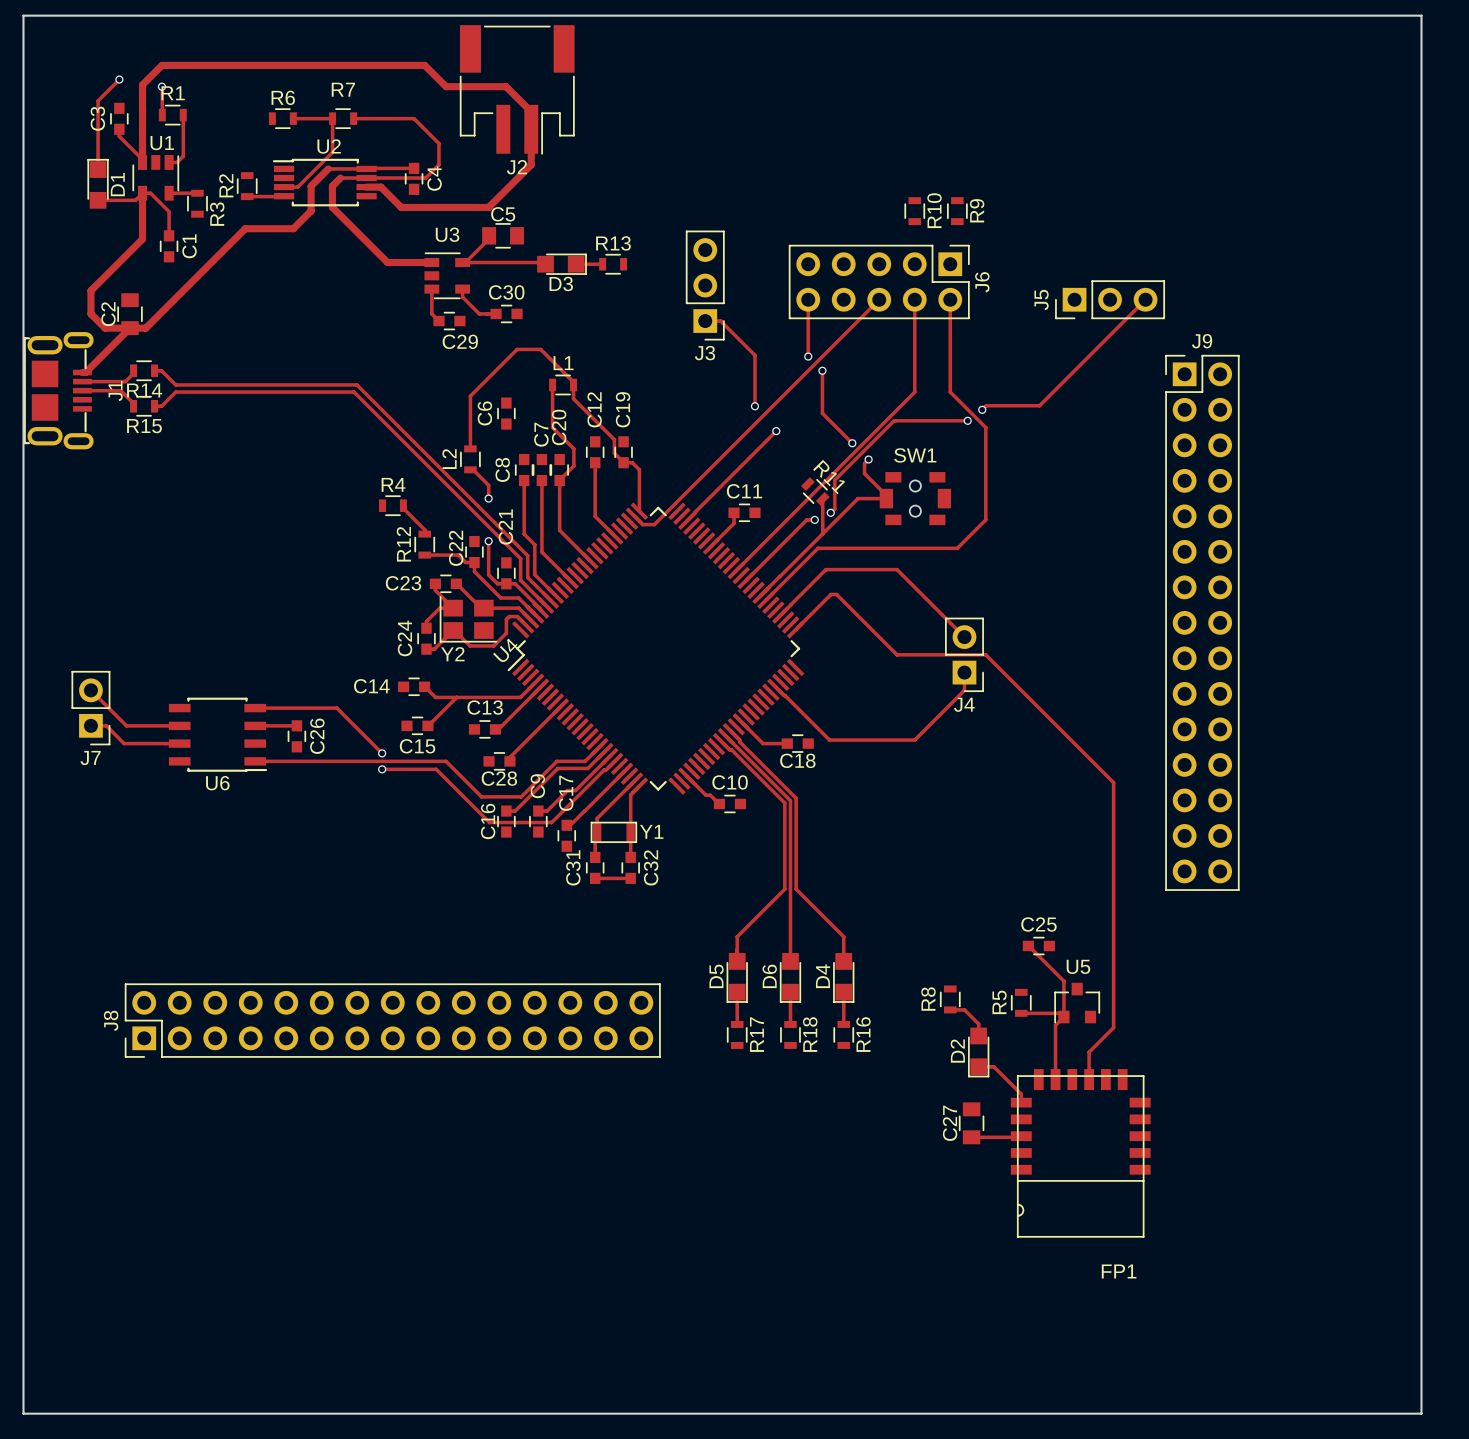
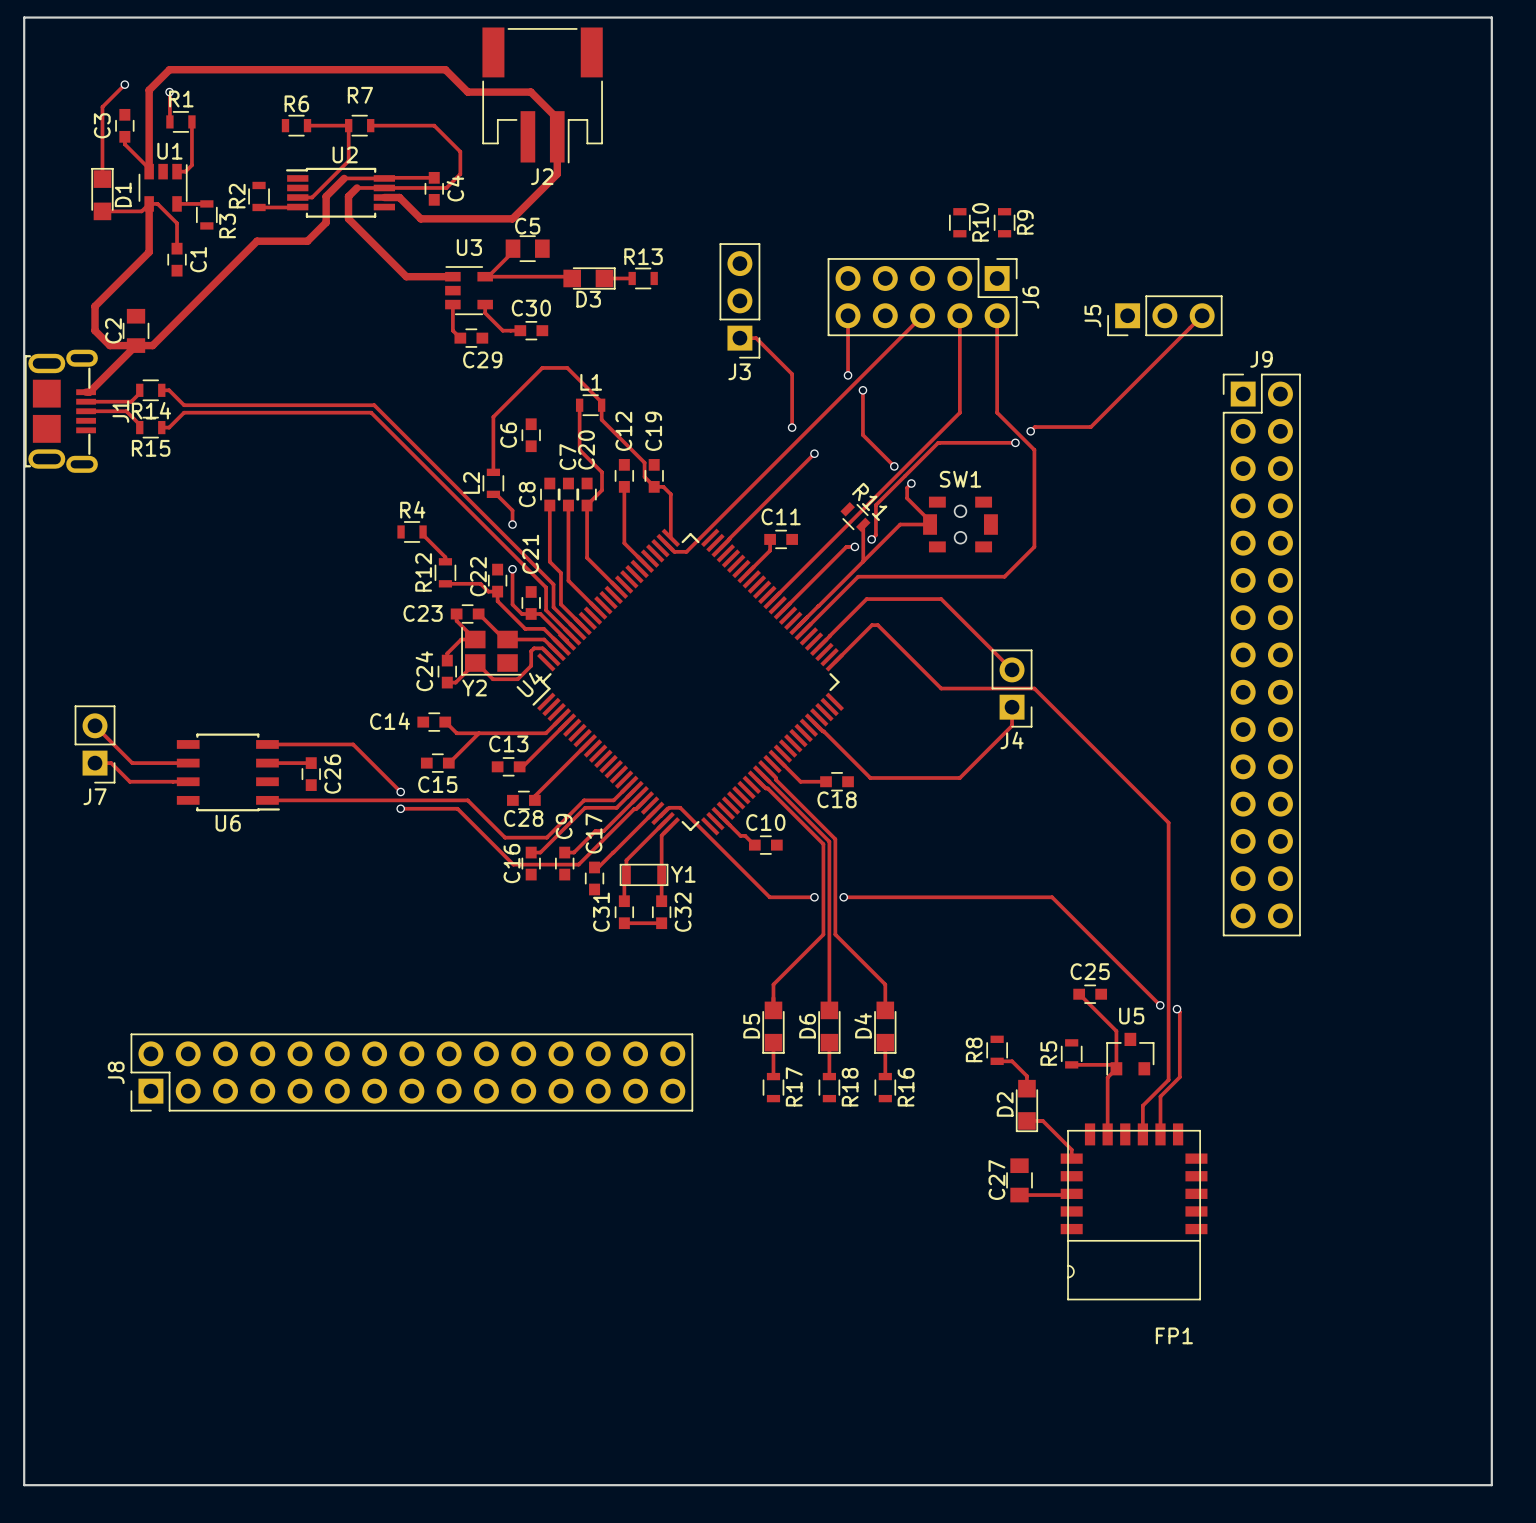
track: none -> (660, 815) (669, 807) (680, 807) (769, 897) (814, 897)
via: none -> (814, 897)
track: none -> (843, 897) (1052, 897) (1160, 1005)
via: none -> (843, 897)
via: none -> (1160, 1005)
track: none -> (1177, 1009) (1179, 1011) (1179, 1077) (1160, 1096) (1160, 1134)
via: none -> (1177, 1009)

